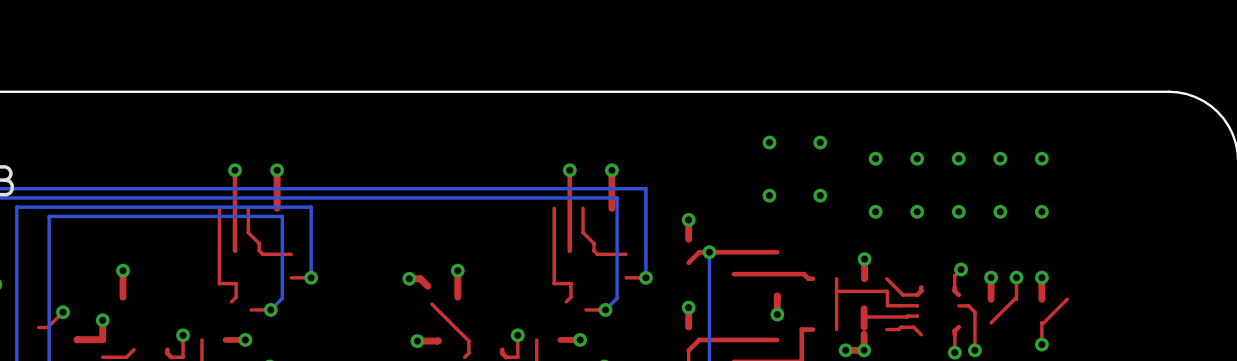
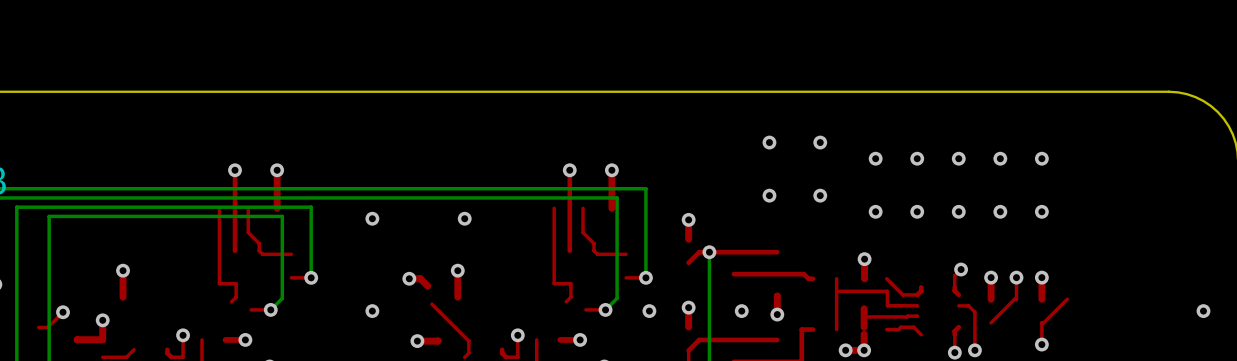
via: none -> (372, 218)
via: none -> (464, 218)
via: none -> (372, 311)
via: none -> (649, 311)
via: none -> (741, 311)
via: none -> (1203, 311)

